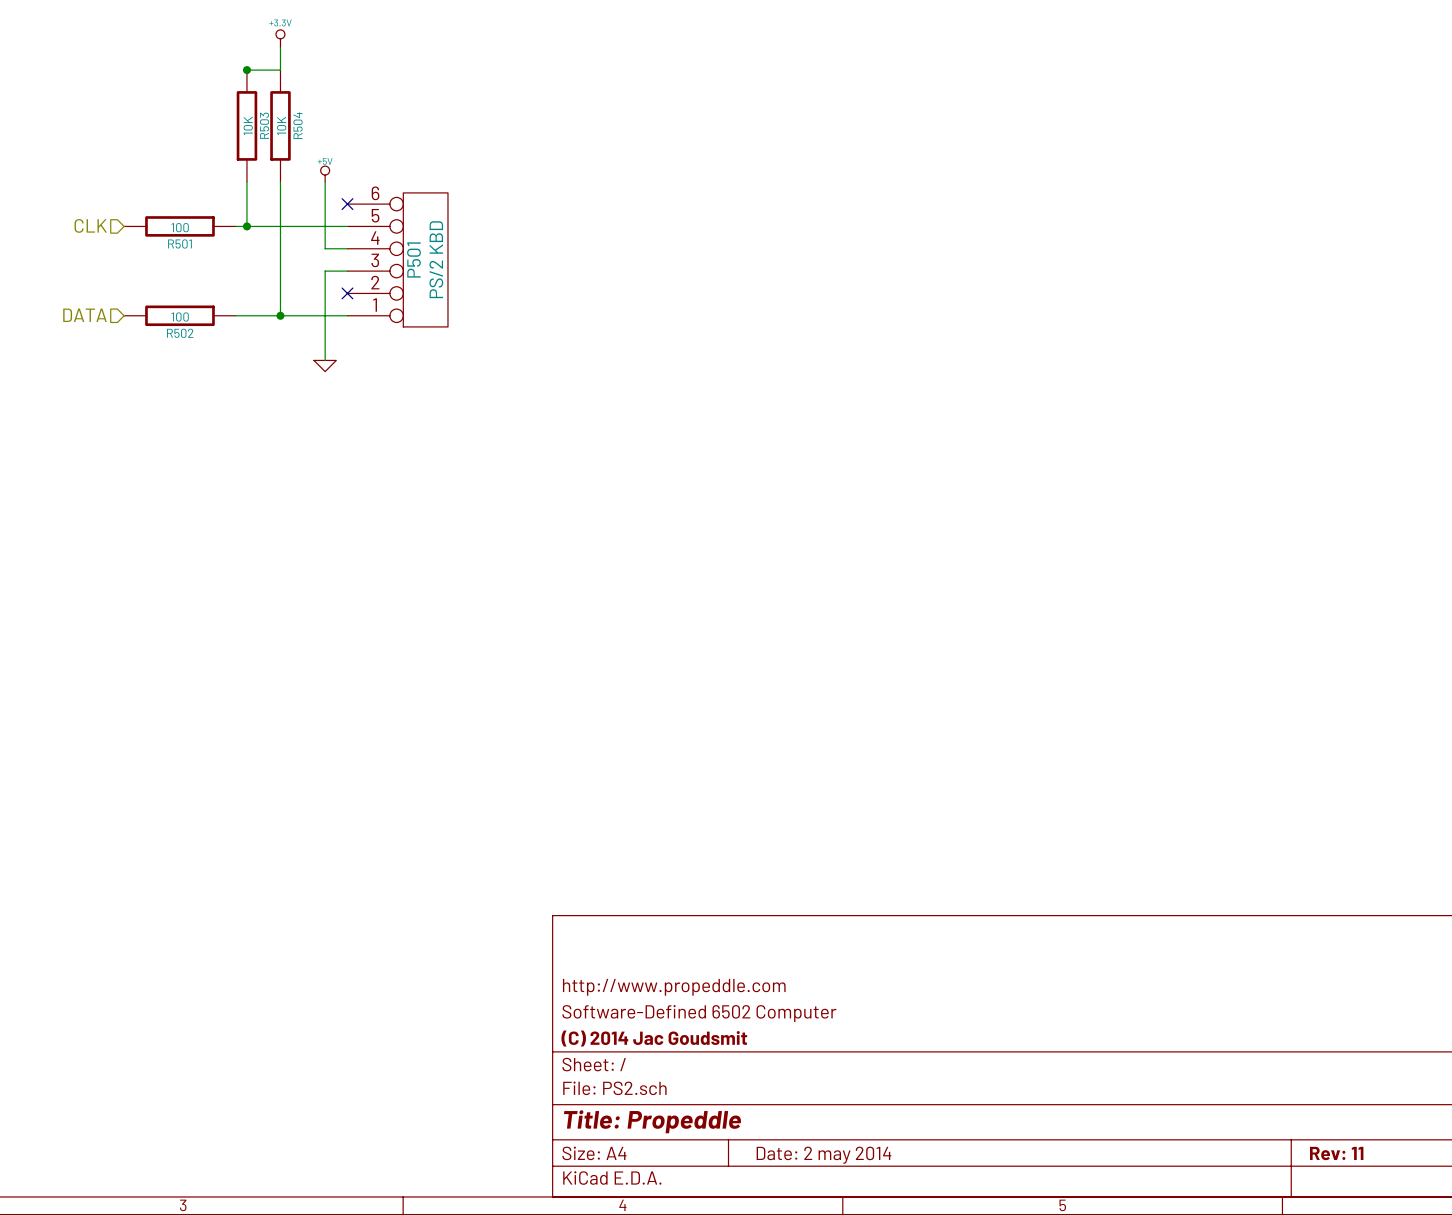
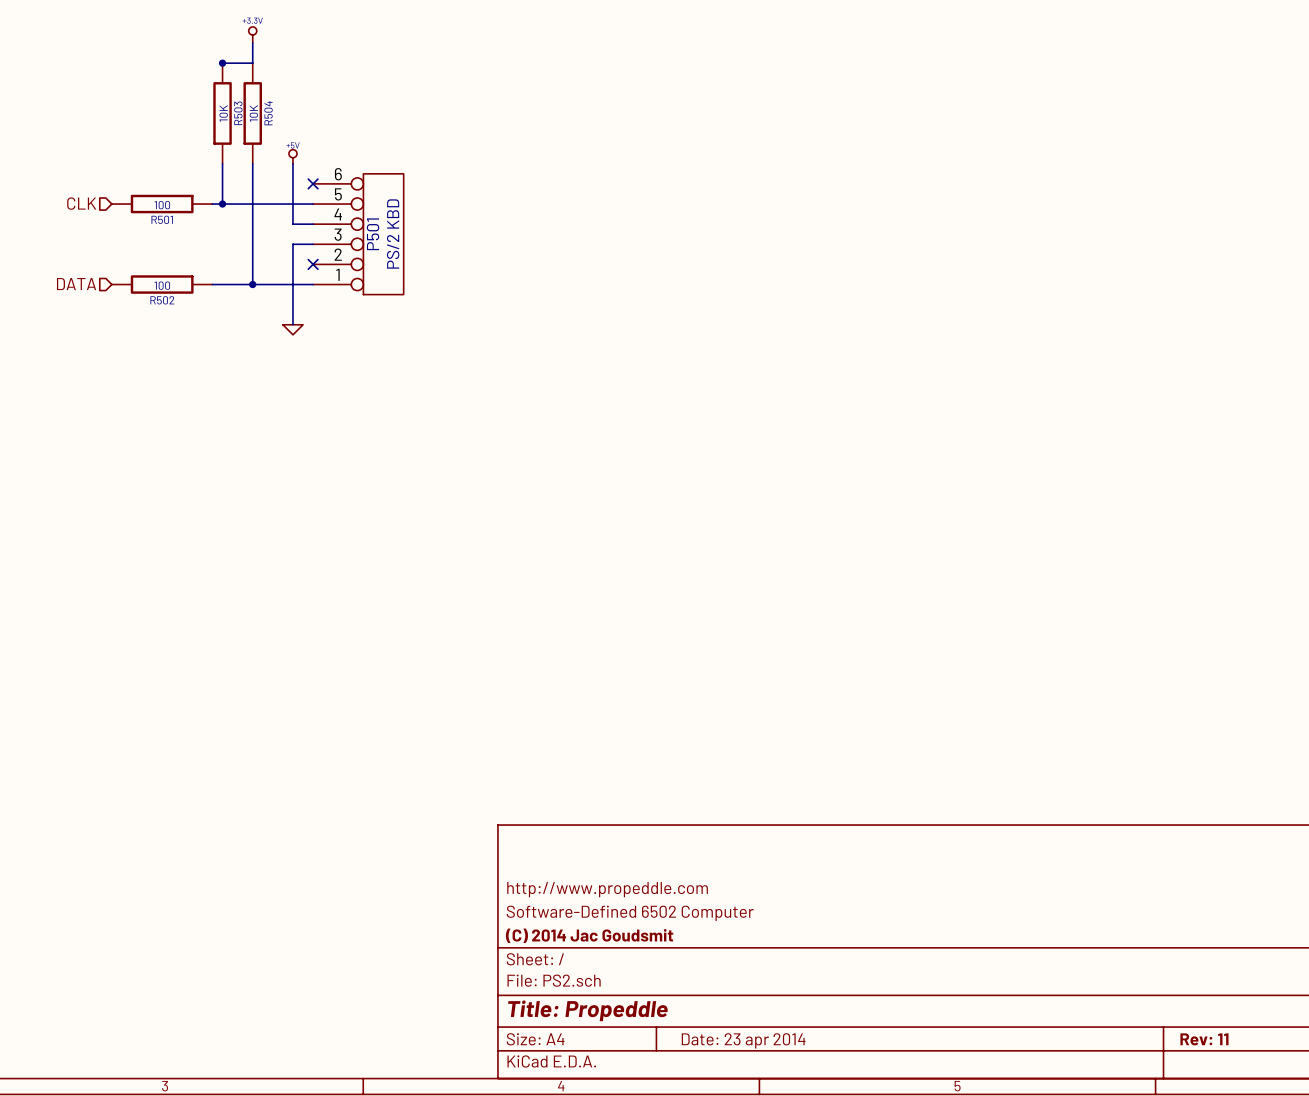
title block: Date: 2 may 2014 (823, 1155) -> Date: 23 apr 2014 (743, 1040)

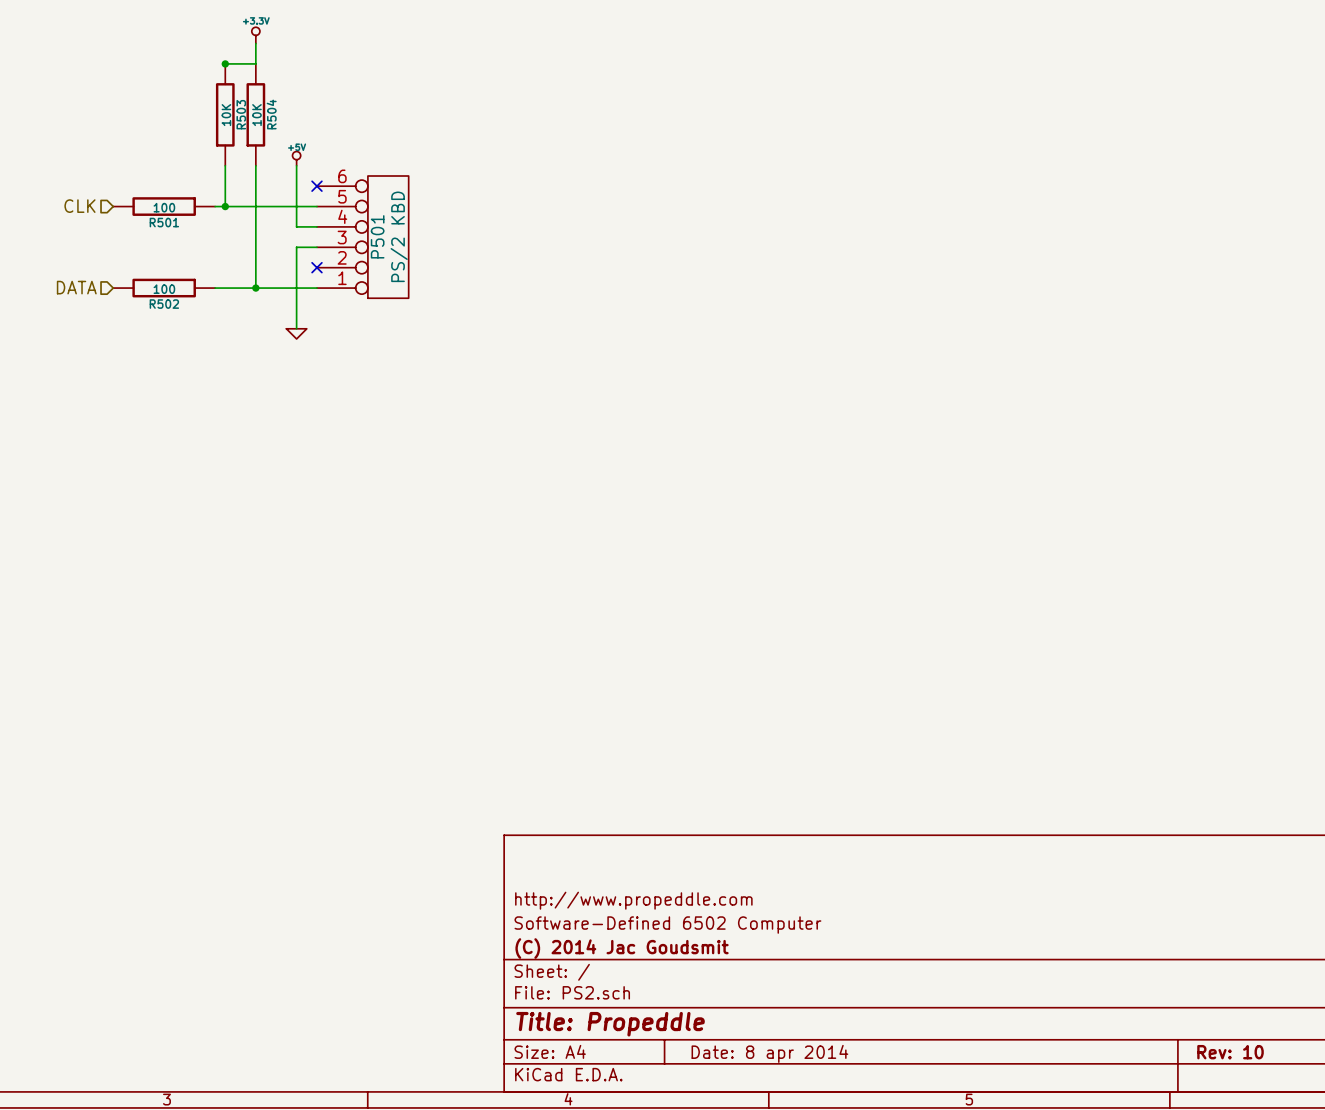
title block: Rev: 11 (1204, 1039) -> Rev: 10 (1230, 1052)
title block: Date: 23 apr 2014 (743, 1040) -> Date: 8 apr 2014 (769, 1053)

